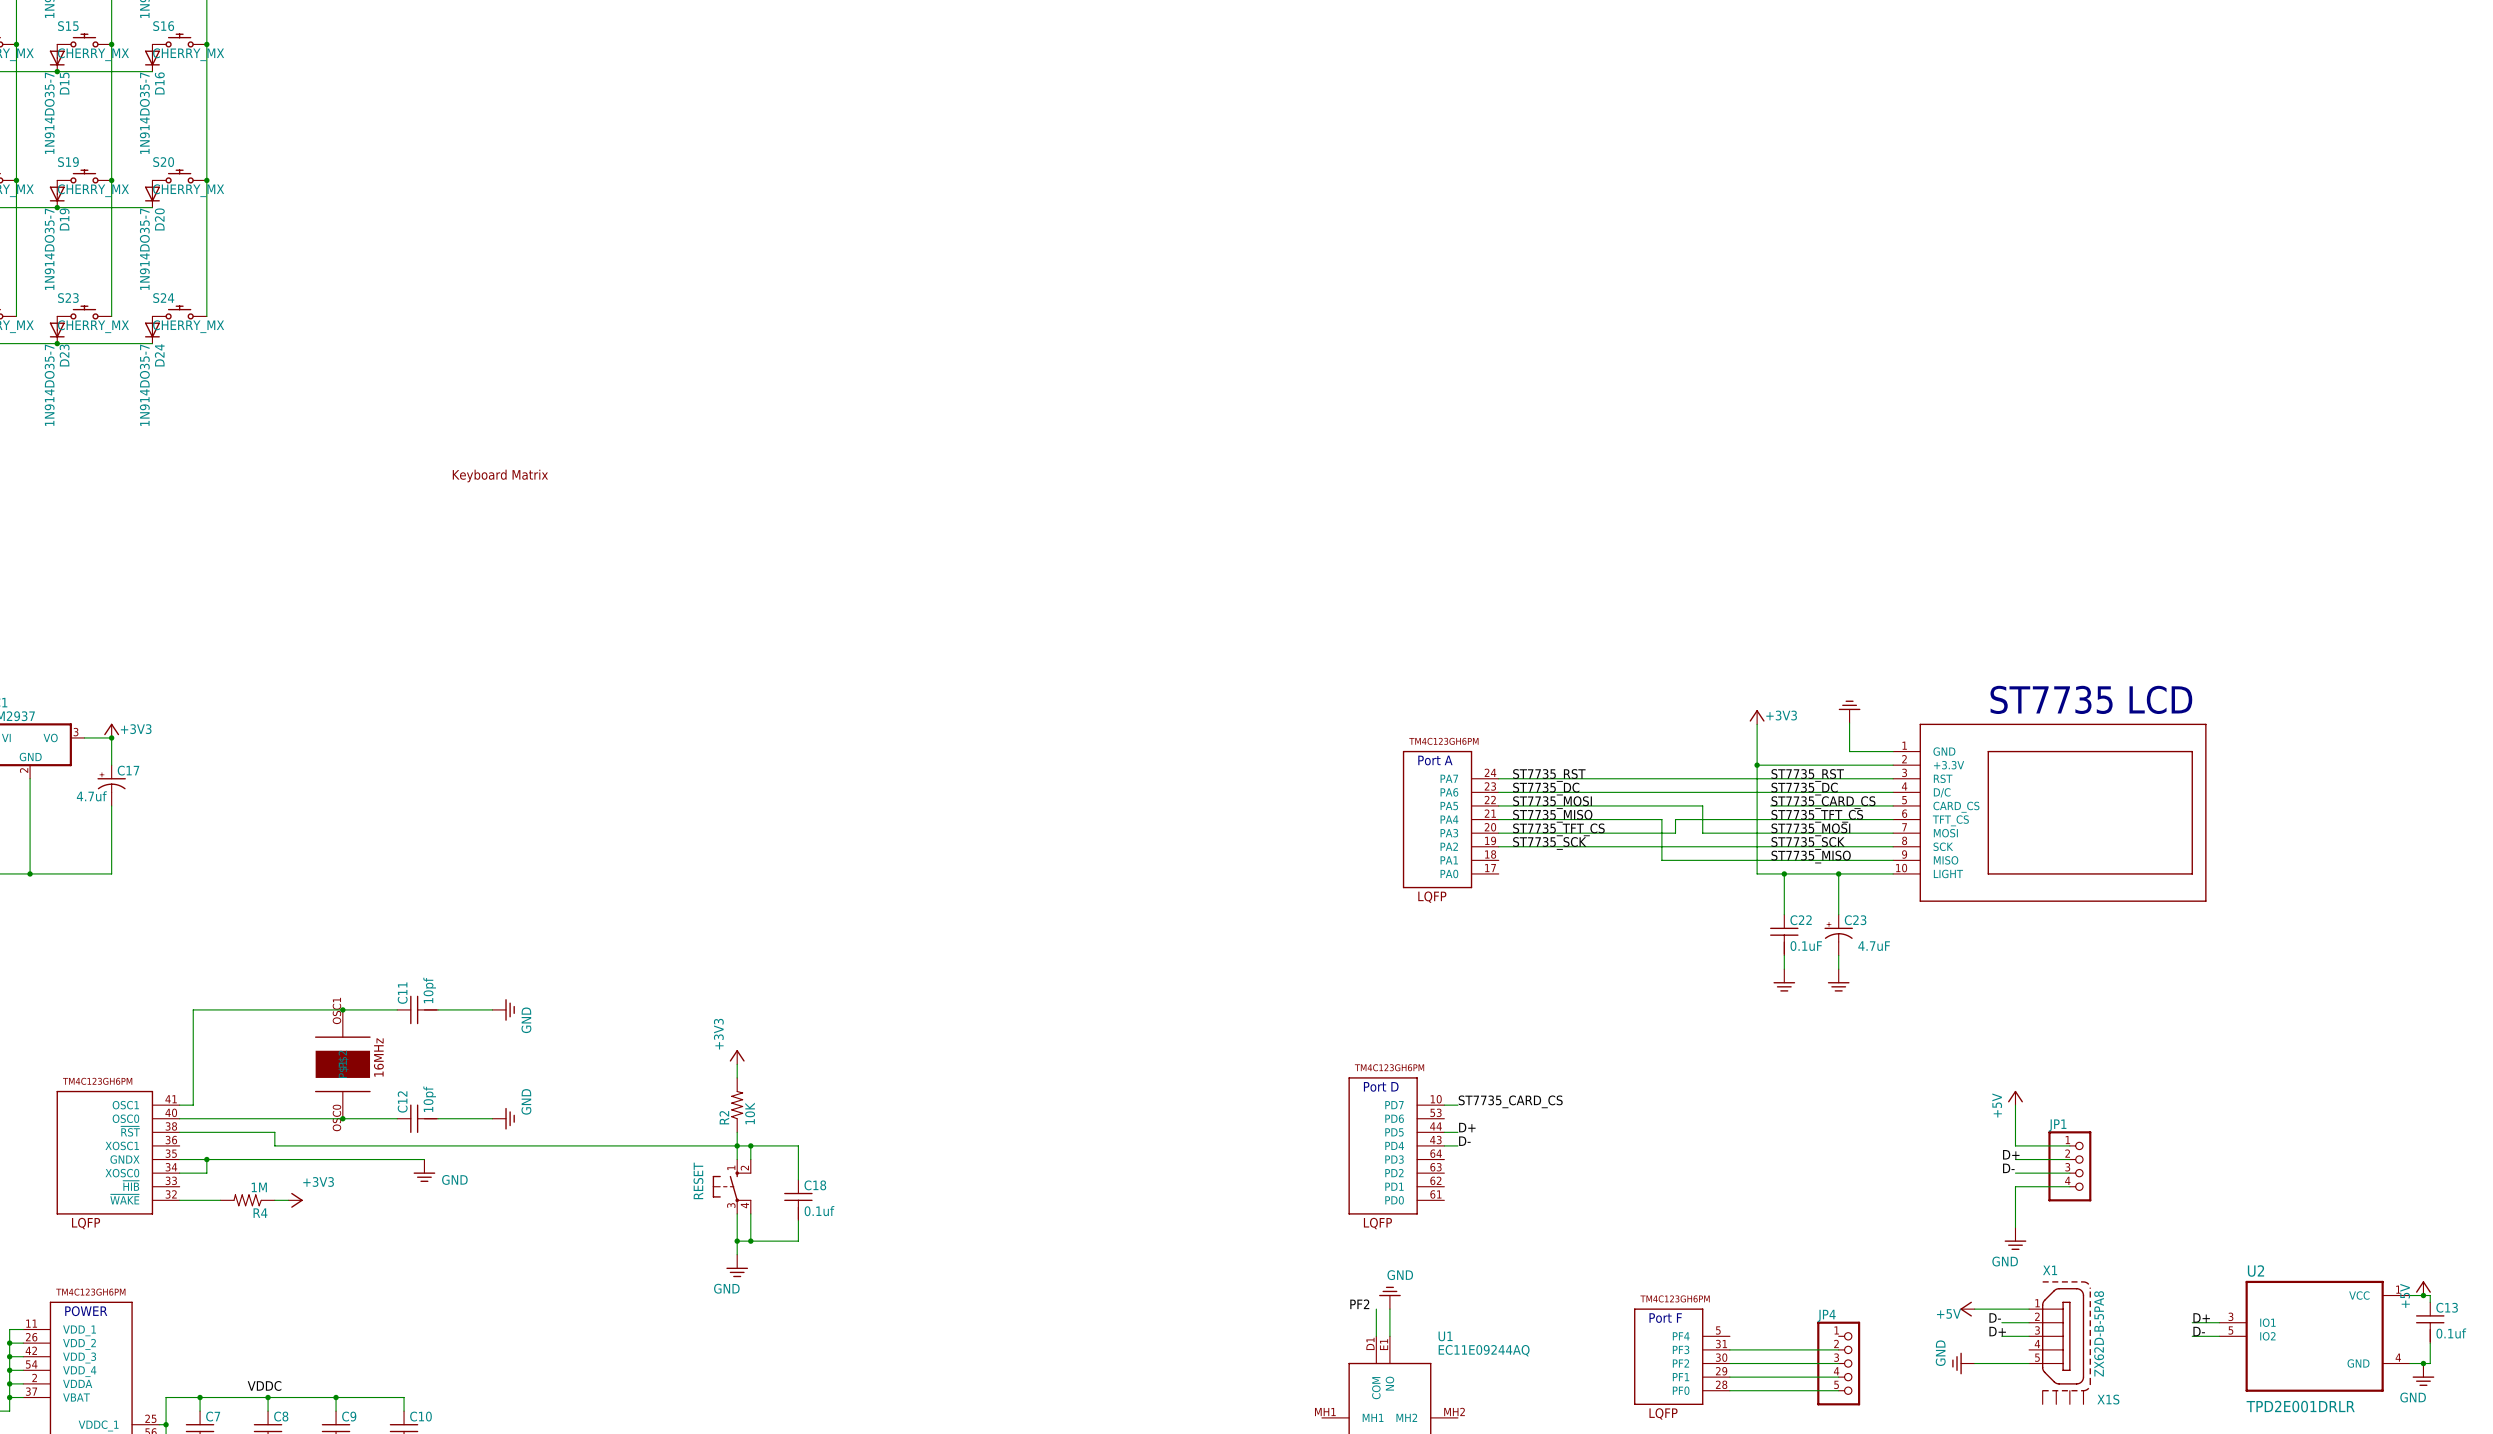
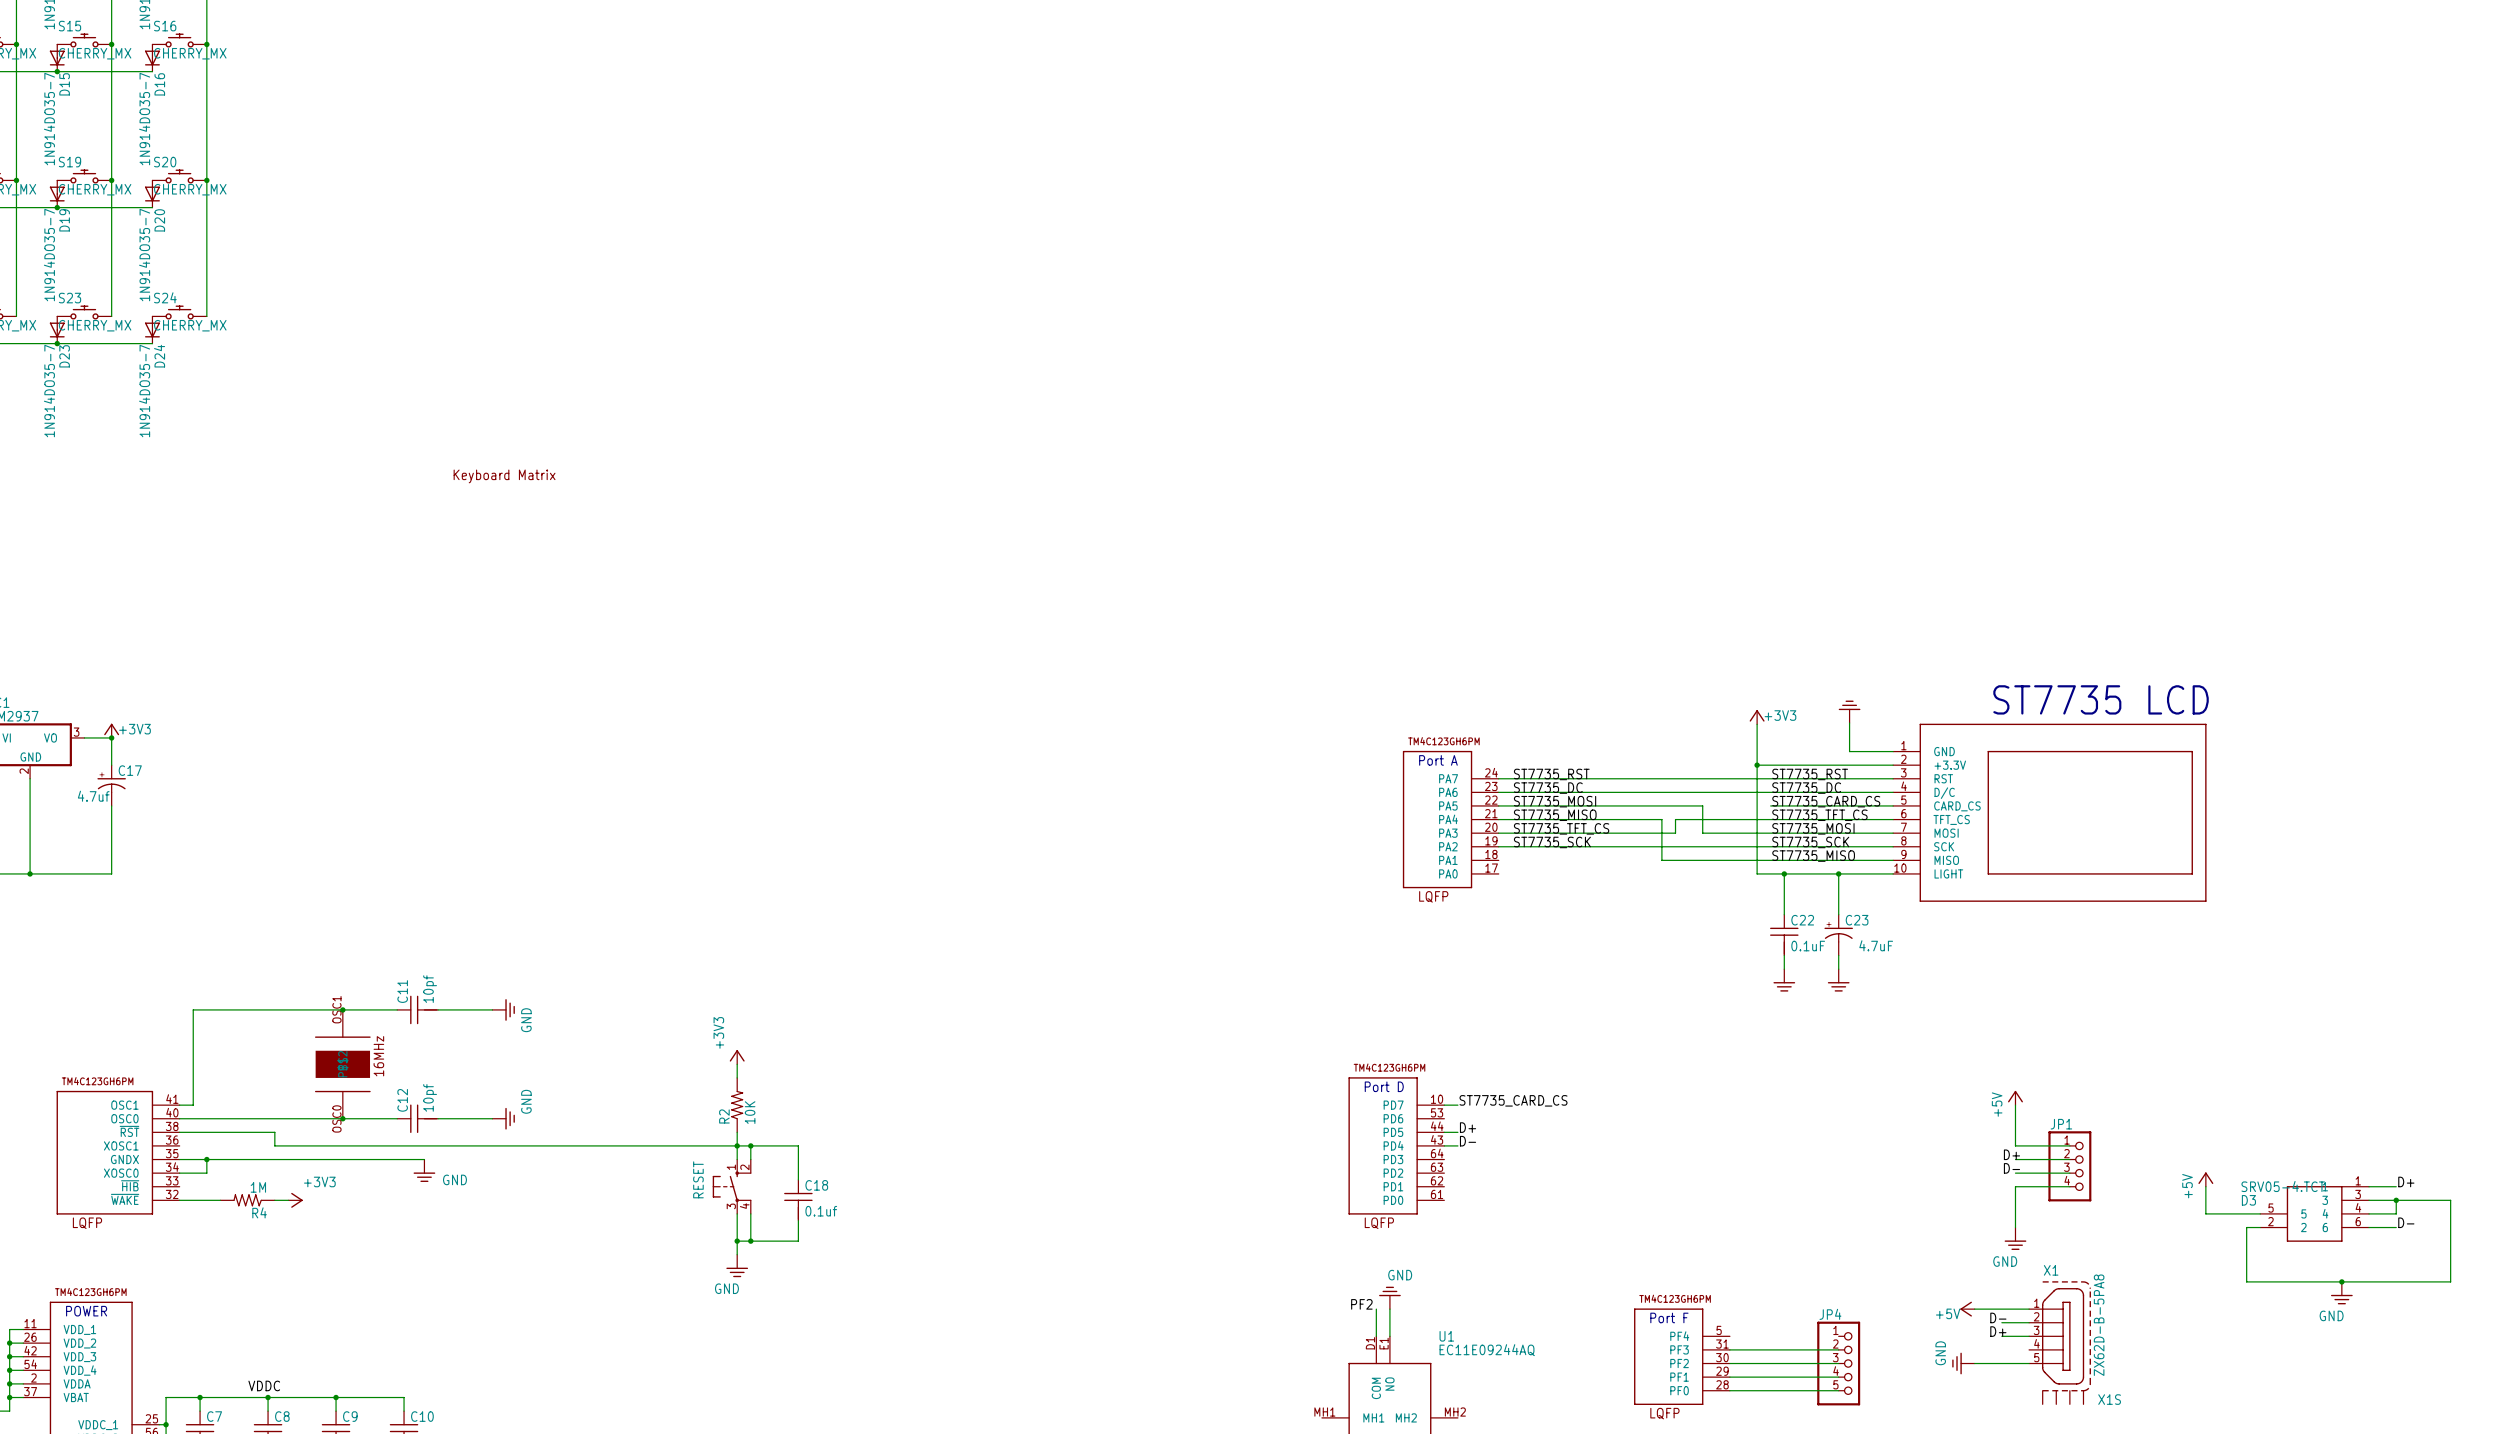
power symbol: none -> +5V (2205, 1179)
label: none -> D+ (2406, 1181)
wire: none -> (2205, 1186) (2205, 1213) (2260, 1213)
wire: none -> (2369, 1186) (2396, 1186)
wire: none -> (2369, 1200) (2450, 1200) (2450, 1281) (2246, 1281) (2246, 1227) (2260, 1227)
wire: none -> (2396, 1200) (2396, 1213) (2369, 1213)
junction: none -> (2396, 1200)
D3: none -> SRV05-4.TCT (2314, 1213)
label: none -> D- (2406, 1222)
wire: none -> (2369, 1227) (2396, 1227)
junction: none -> (2341, 1281)
power symbol: +5V (2423, 1288) -> none
wire: (2409, 1295) (2430, 1295) (2430, 1302) -> none
junction: (2423, 1295) -> none
label: D+ (2201, 1317) -> none
wire: (2192, 1322) (2219, 1322) -> none
C13: 0.1uf (2430, 1322) -> none
label: D- (2199, 1331) -> none
wire: (2192, 1336) (2219, 1336) -> none
U2: TPD2E001DRLR (2314, 1336) -> none
wire: (2430, 1343) (2430, 1363) (2409, 1363) -> none
junction: (2423, 1363) -> none
power symbol position: GND (2423, 1374) -> GND (2341, 1293)

